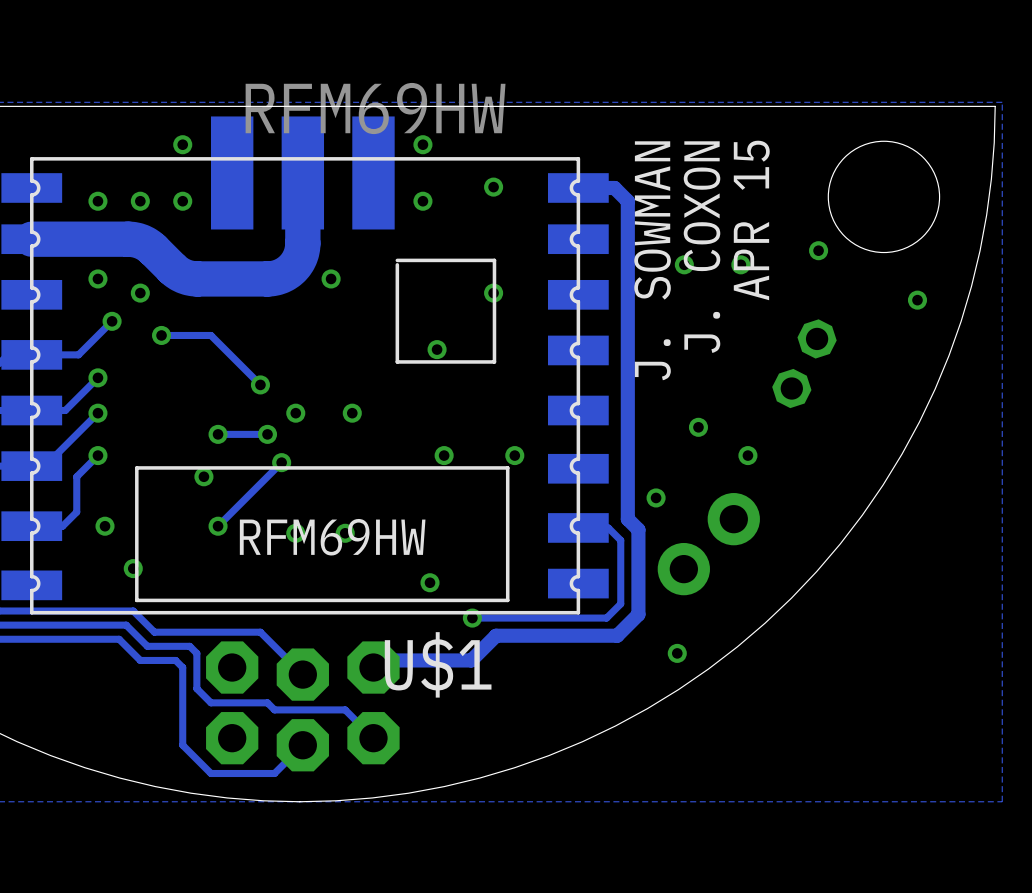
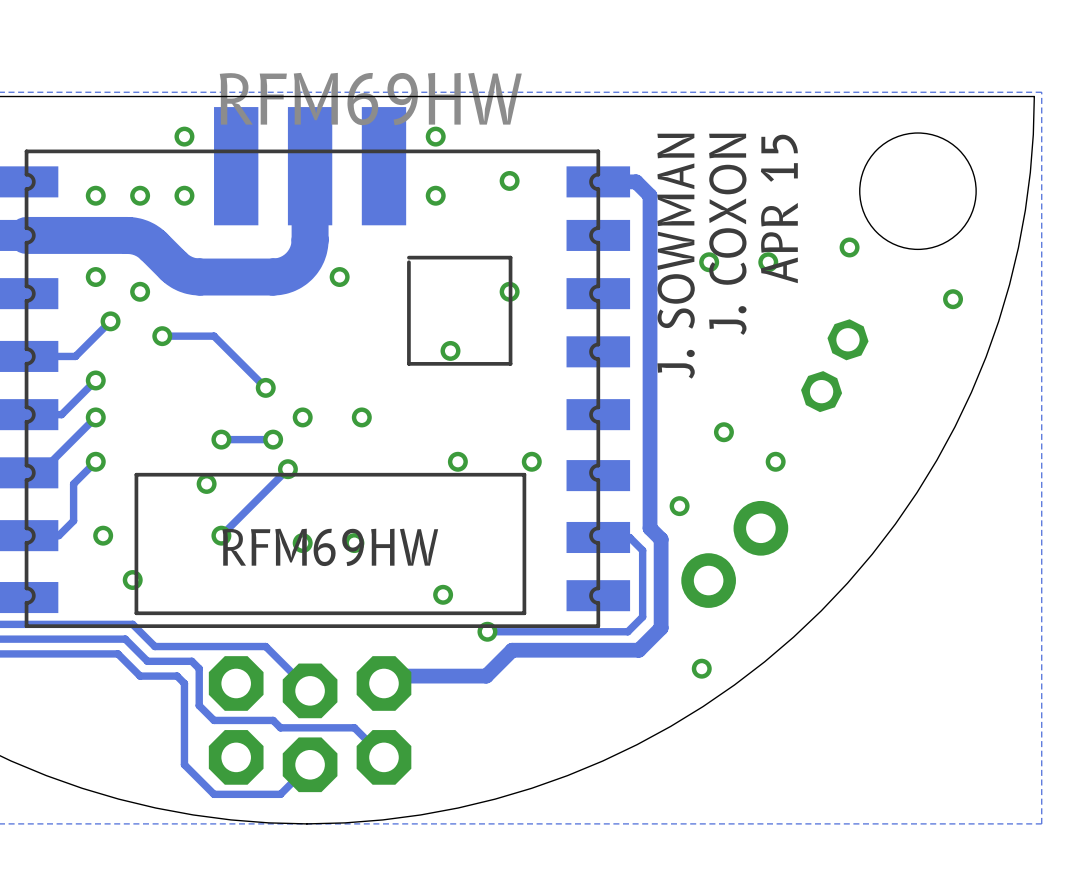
U$1 name: U$1 (438, 664) -> none

